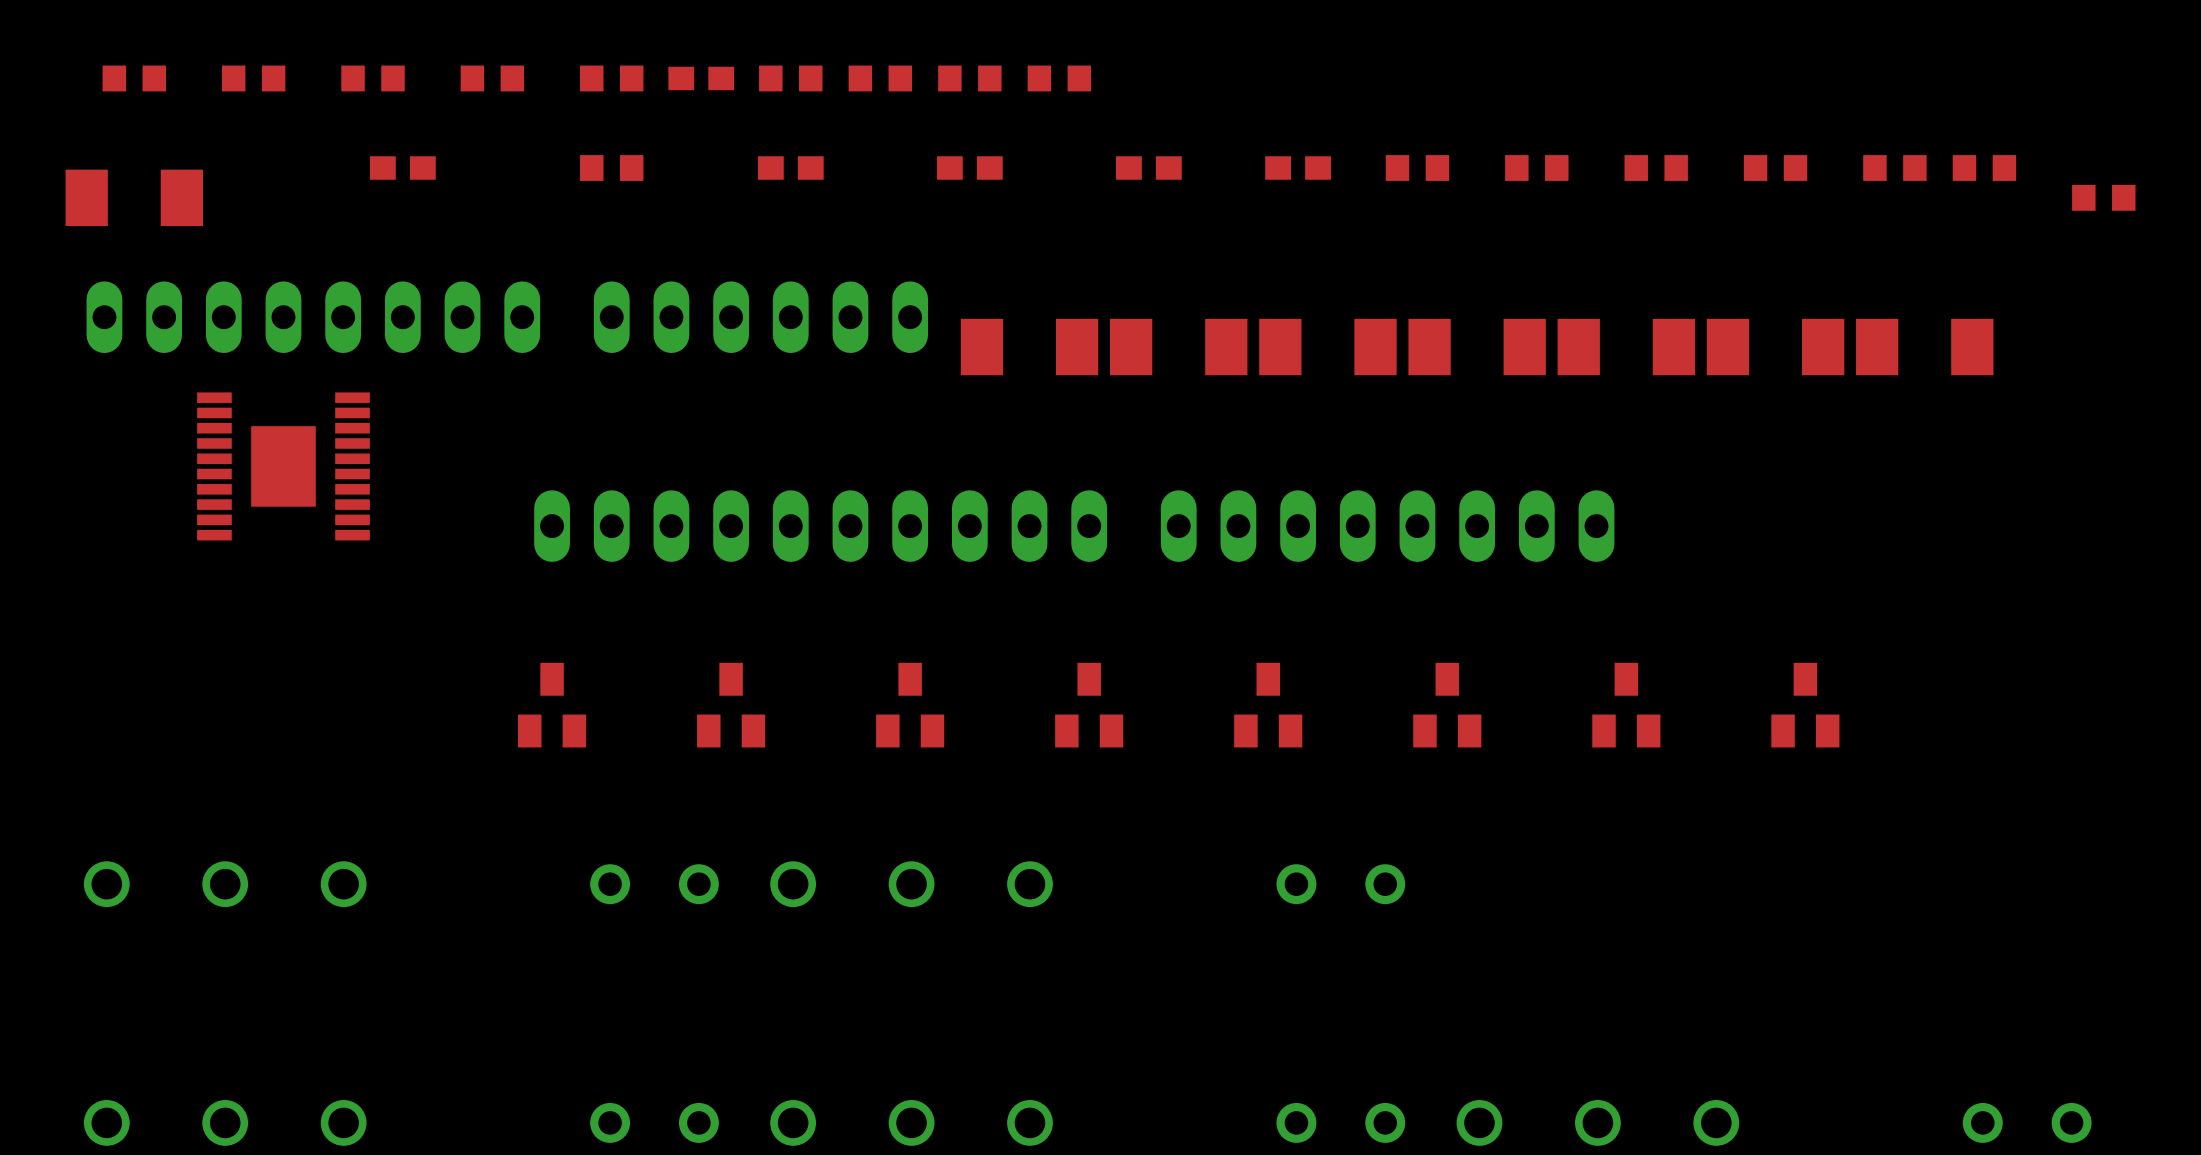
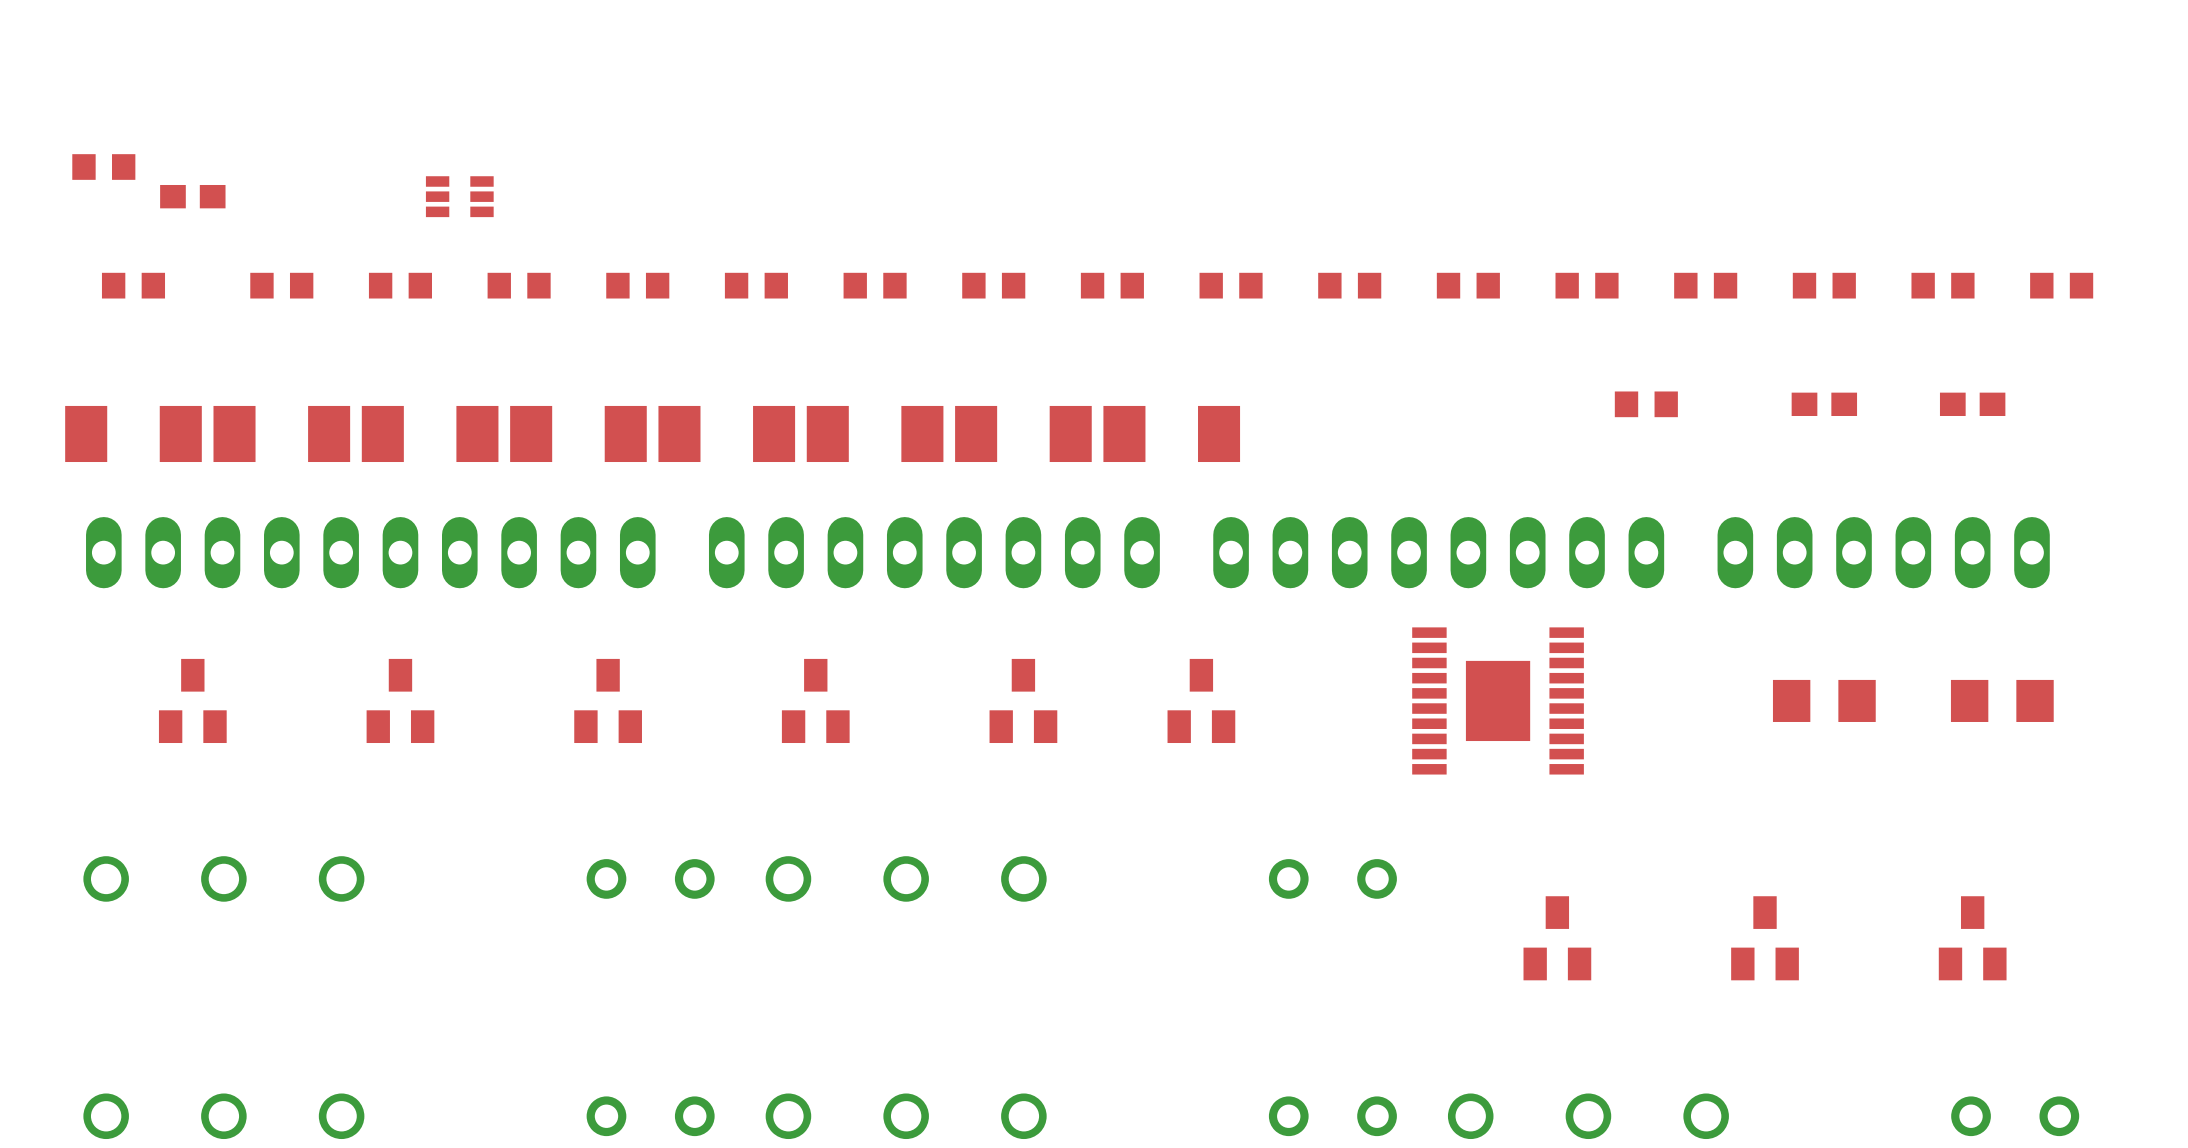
part: (134, 78) -> none
part: (253, 78) -> none
part: (373, 78) -> none
part: (492, 78) -> none
part: (611, 78) -> none
part: (701, 78) -> none
part: (790, 78) -> none
part: (880, 78) -> none
part: (969, 78) -> none
part: (1059, 78) -> none
part: none -> (103, 167)
part position: (402, 168) -> (192, 196)
part: (611, 168) -> none
part: (790, 168) -> none
part: (969, 168) -> none
part: (1148, 168) -> none
part: (1298, 168) -> none
part: (1417, 168) -> none
part: (1536, 168) -> none
part: (1656, 168) -> none
part: (1775, 168) -> none
part: (1894, 168) -> none
part: (1984, 168) -> none
part: (134, 197) -> none
part: none -> (459, 196)
part: (2103, 197) -> none
part: none -> (133, 285)
part: none -> (281, 285)
part: none -> (400, 285)
part: none -> (519, 285)
part: none -> (637, 285)
part: none -> (756, 285)
part: none -> (875, 285)
part: none -> (993, 285)
part: none -> (1112, 285)
part: none -> (1231, 285)
part: none -> (1349, 285)
part: none -> (1468, 285)
part: none -> (1587, 285)
part: none -> (1705, 285)
part: none -> (1824, 285)
part: none -> (1943, 285)
part: none -> (2061, 285)
part: (313, 317) -> none
part: (760, 317) -> none
part: (1029, 347) -> none
part: (1178, 347) -> none
part: (1327, 347) -> none
part: (1477, 347) -> none
part: (1626, 347) -> none
part: (1775, 347) -> none
part: (1924, 347) -> none
part: none -> (1646, 404)
part: none -> (1824, 404)
part: none -> (1972, 404)
part: none -> (133, 433)
part: none -> (281, 433)
part: none -> (430, 433)
part: none -> (578, 433)
part: none -> (726, 433)
part: none -> (875, 433)
part: none -> (1023, 433)
part: none -> (1171, 433)
part: (283, 466) -> none
part position: (820, 526) -> (370, 552)
part position: (1387, 526) -> (1438, 552)
part: none -> (934, 552)
part: none -> (1883, 552)
part: none -> (192, 700)
part: none -> (400, 700)
part: (552, 705) -> none
part: none -> (608, 700)
part: (731, 705) -> none
part: none -> (815, 700)
part: (910, 705) -> none
part: none -> (1023, 700)
part: (1089, 705) -> none
part: none -> (1201, 700)
part: (1268, 705) -> none
part: (1447, 705) -> none
part: none -> (1498, 700)
part: (1626, 705) -> none
part: (1805, 705) -> none
part: none -> (1824, 700)
part: none -> (2002, 700)
part: none -> (1557, 938)
part: none -> (1765, 938)
part: none -> (1972, 938)

